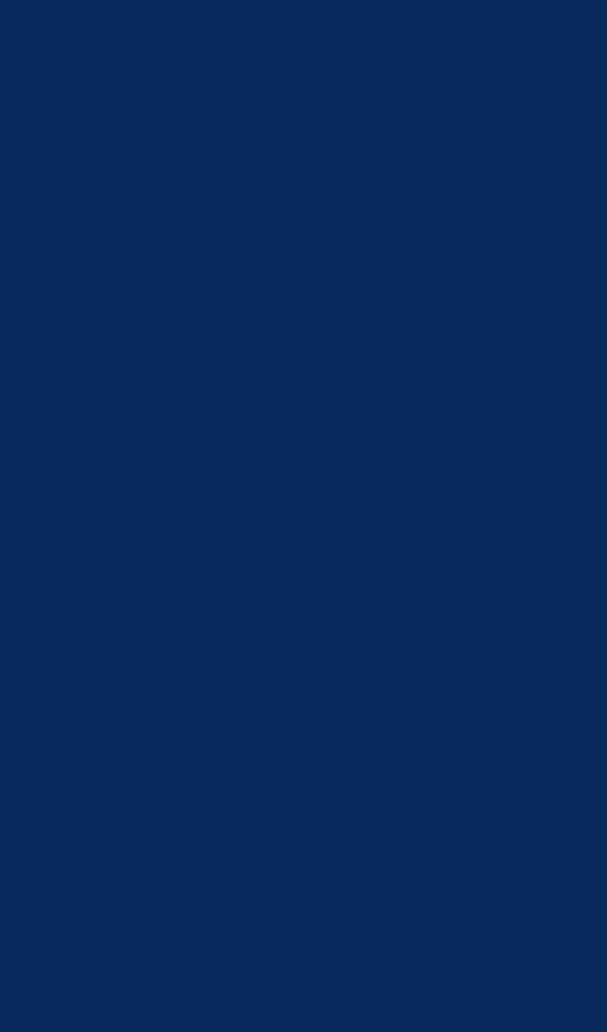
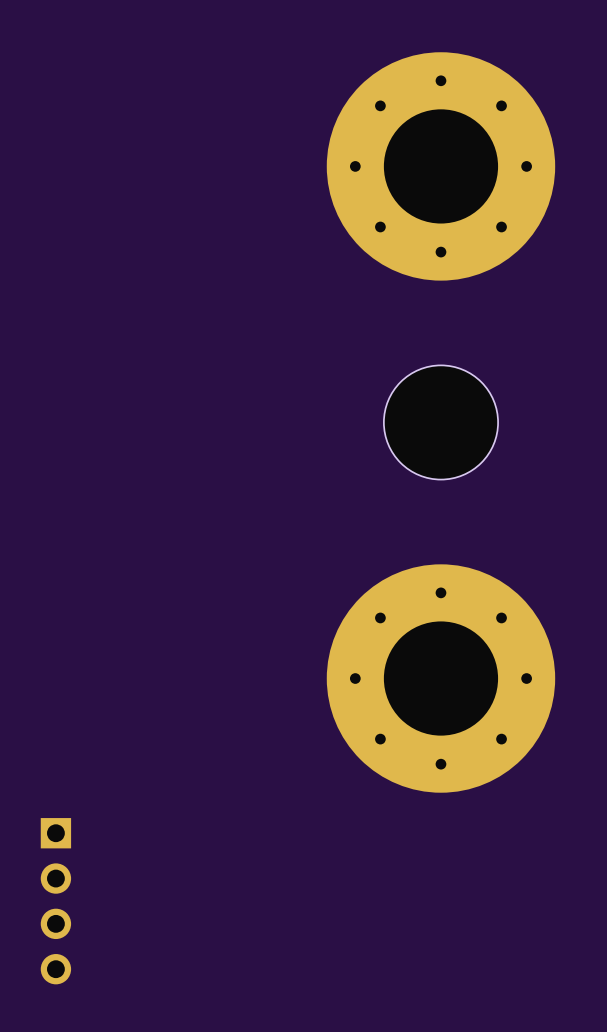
part: none -> (440, 166)
part: none -> (440, 422)
part: none -> (440, 678)
part: none -> (55, 901)

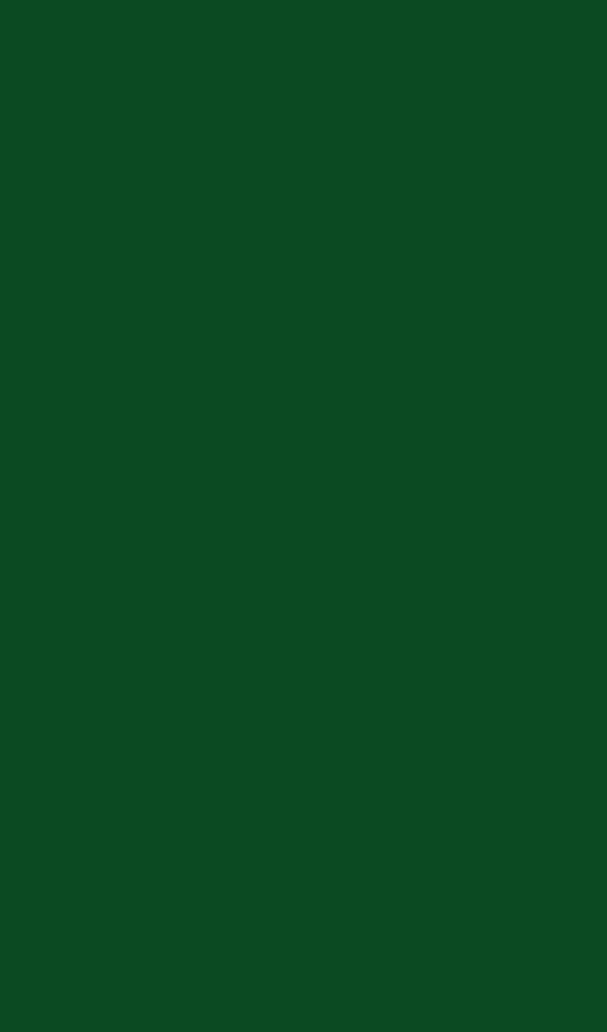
part: (440, 166) -> none
part: (440, 422) -> none
part: (440, 678) -> none
part: (55, 901) -> none

